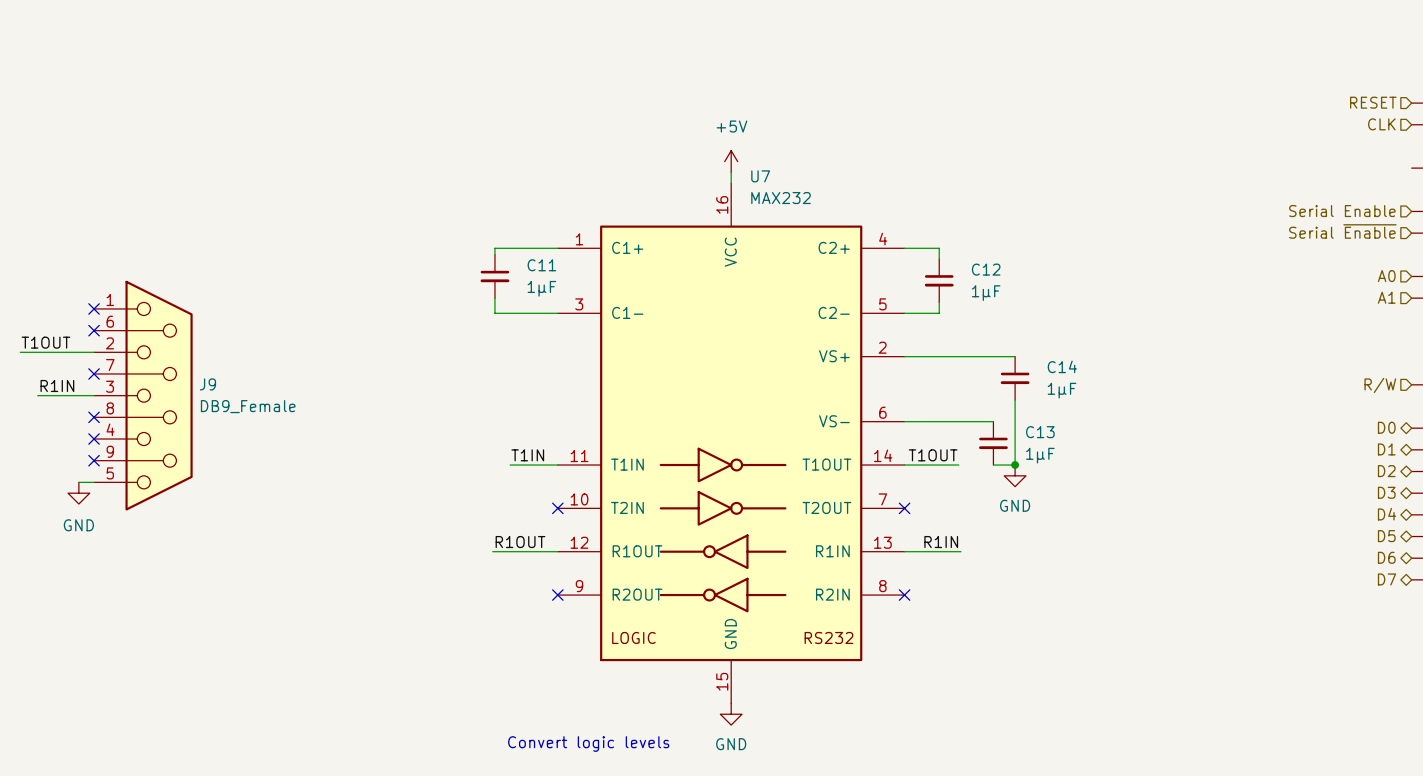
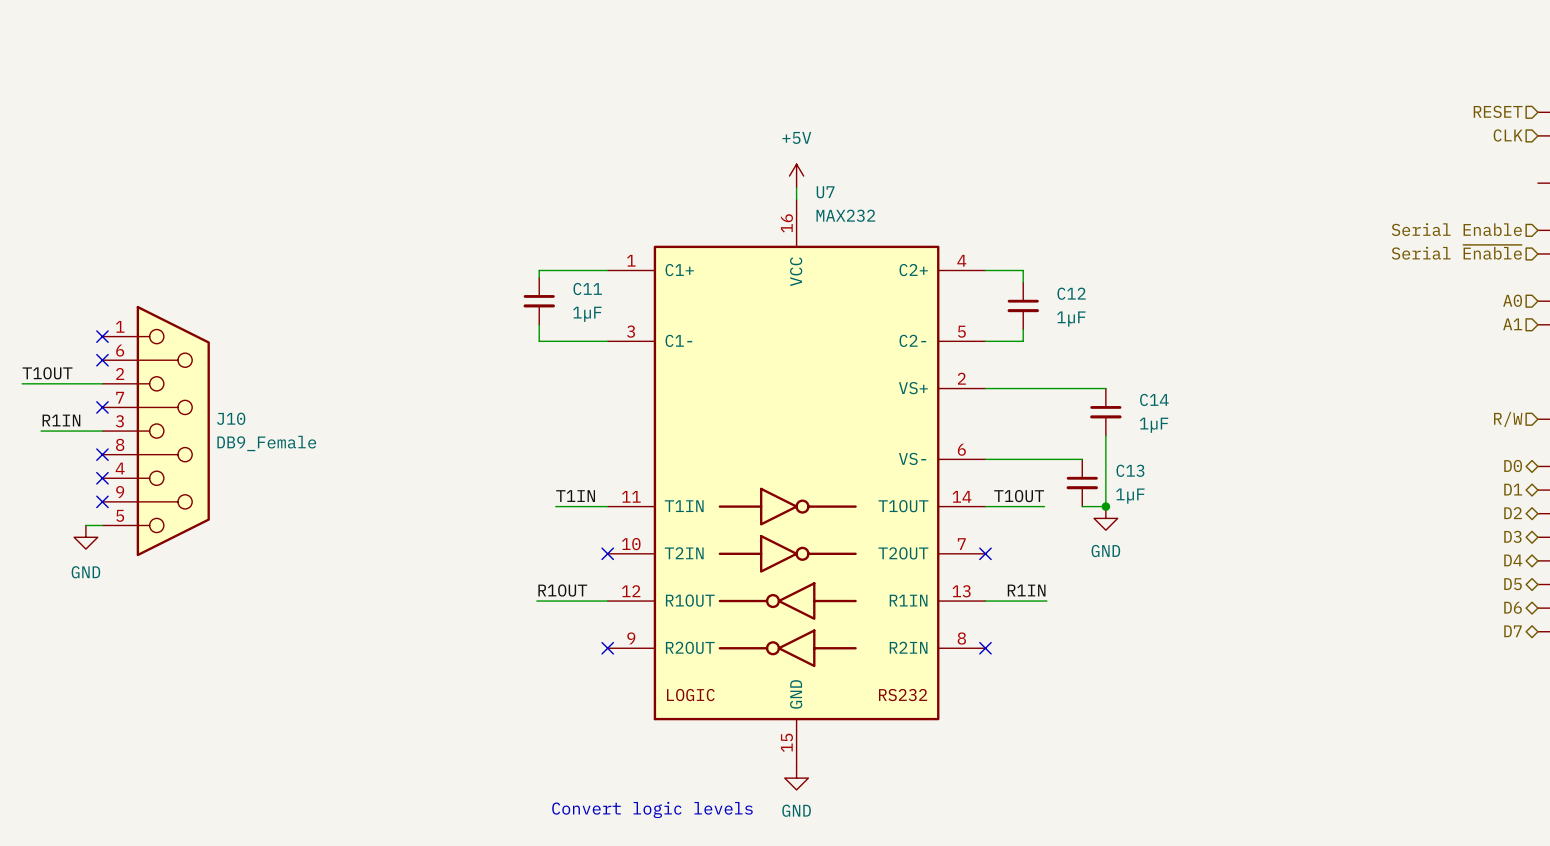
J9 name: J9 (207, 384) -> J10 (231, 418)

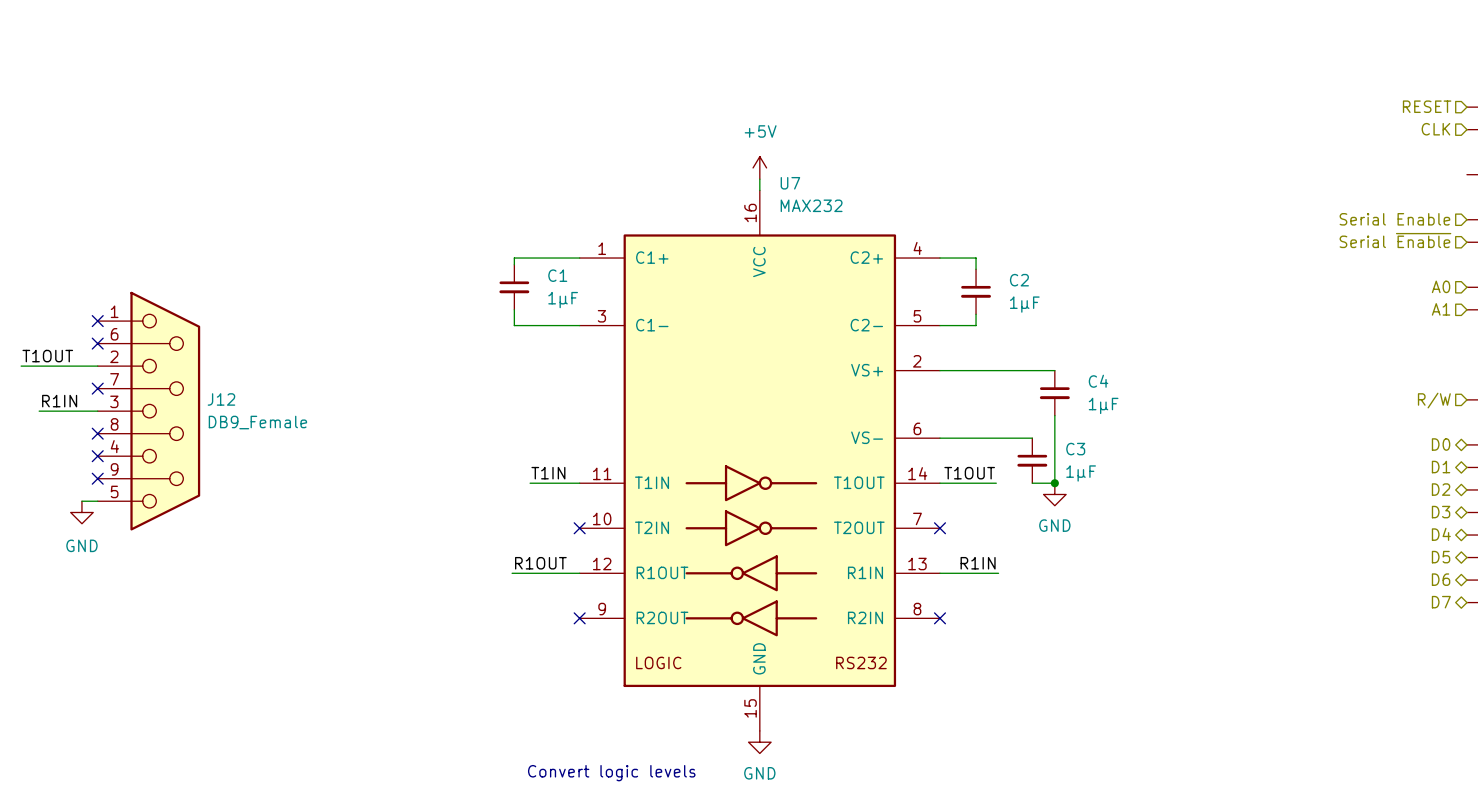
C11 name: C11 (587, 289) -> C1 (557, 275)
C12 name: C12 (1071, 293) -> C2 (1019, 280)
C14 name: C14 (1154, 399) -> C4 (1098, 381)
J10 name: J10 (231, 418) -> J12 (221, 399)
C13 name: C13 (1130, 470) -> C3 (1075, 449)

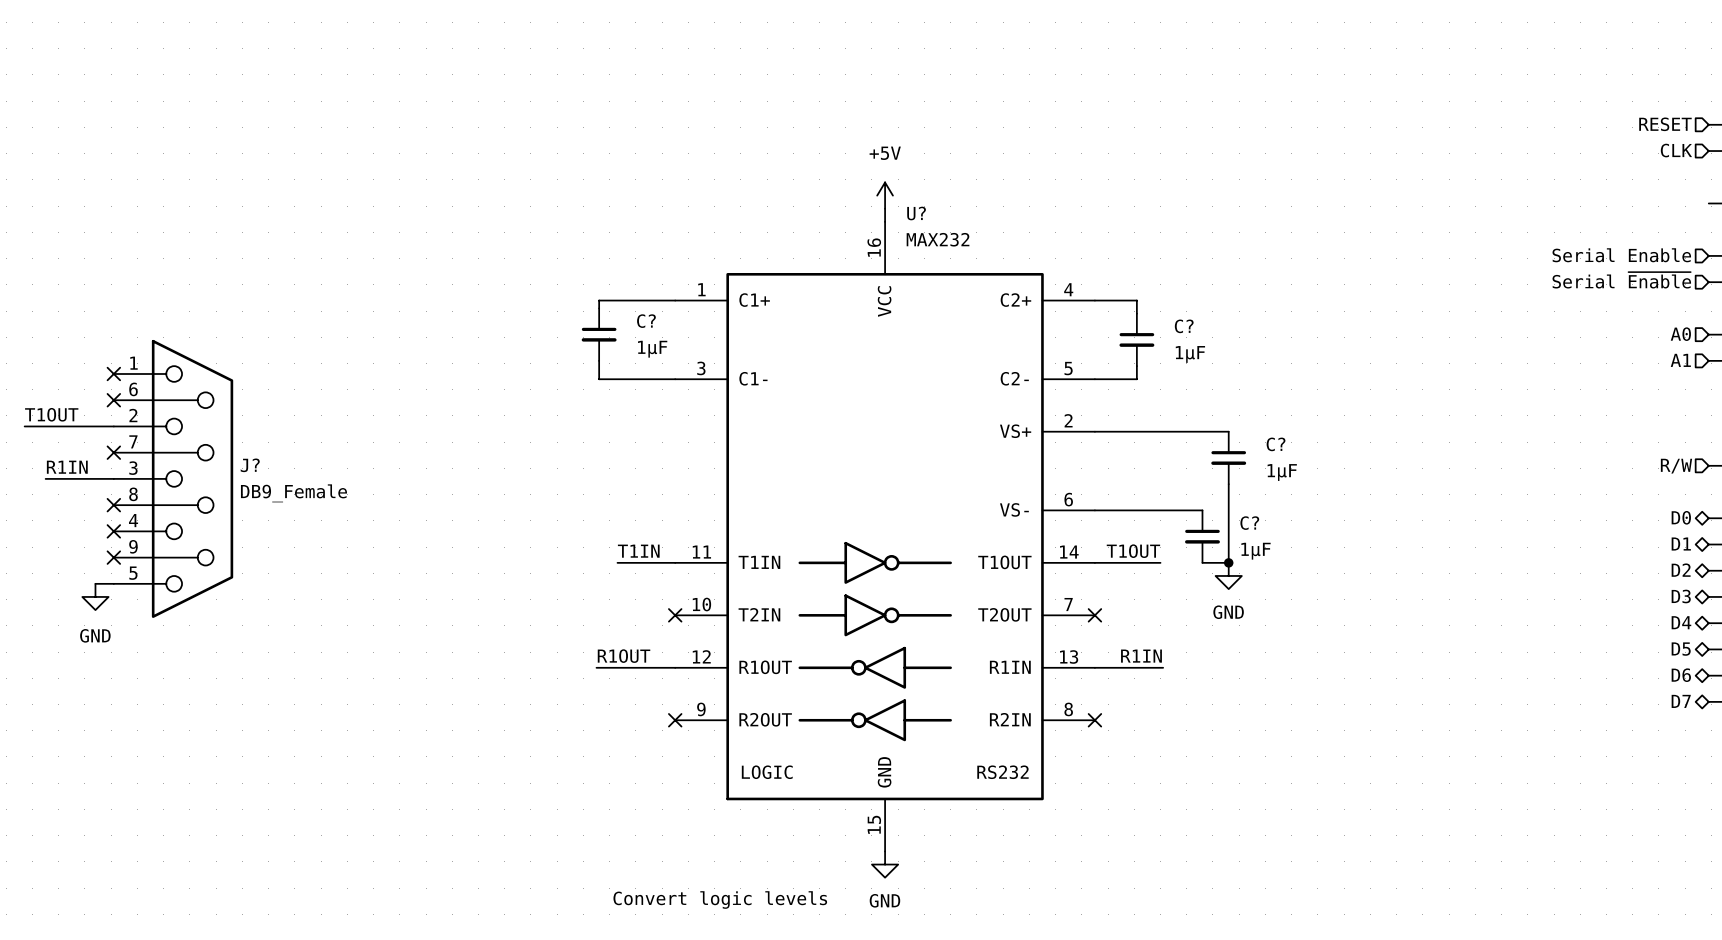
U7 name: U7 (790, 183) -> U? (916, 213)
C1 name: C1 (557, 275) -> C? (646, 321)
C2 name: C2 (1019, 280) -> C? (1184, 326)
C4 name: C4 (1098, 381) -> C? (1276, 444)
J12 name: J12 (221, 399) -> J? (250, 465)
C3 name: C3 (1075, 449) -> C? (1249, 523)

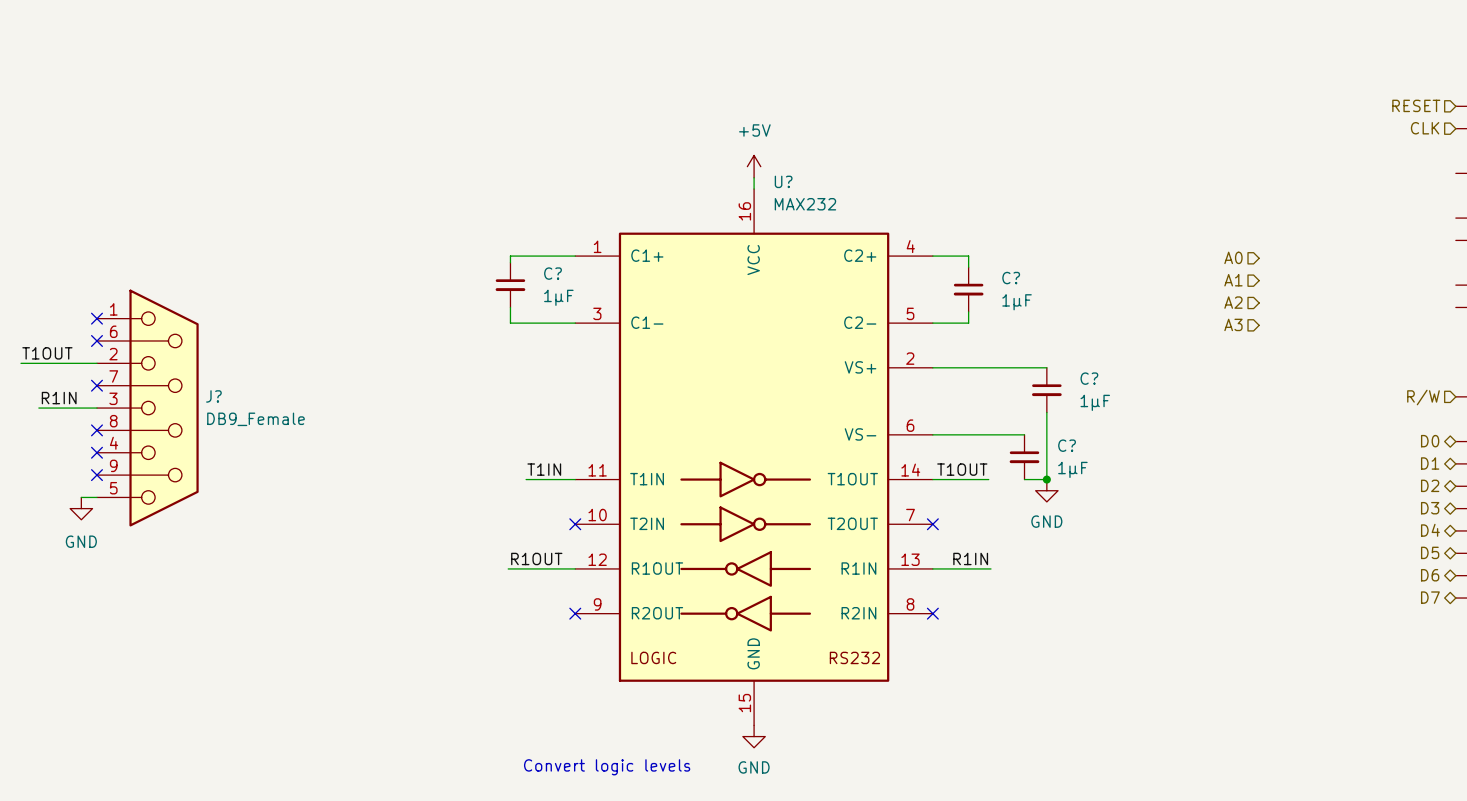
hierarchical label: Serial Enable (1621, 255) -> none
hierarchical label: Serial ~{Enable} (1621, 280) -> none
hierarchical label position: A0 (1680, 334) -> A0 (1233, 257)
hierarchical label: none -> A2 (1233, 302)
hierarchical label position: A1 (1680, 360) -> A1 (1233, 280)
hierarchical label: none -> A3 (1233, 324)

